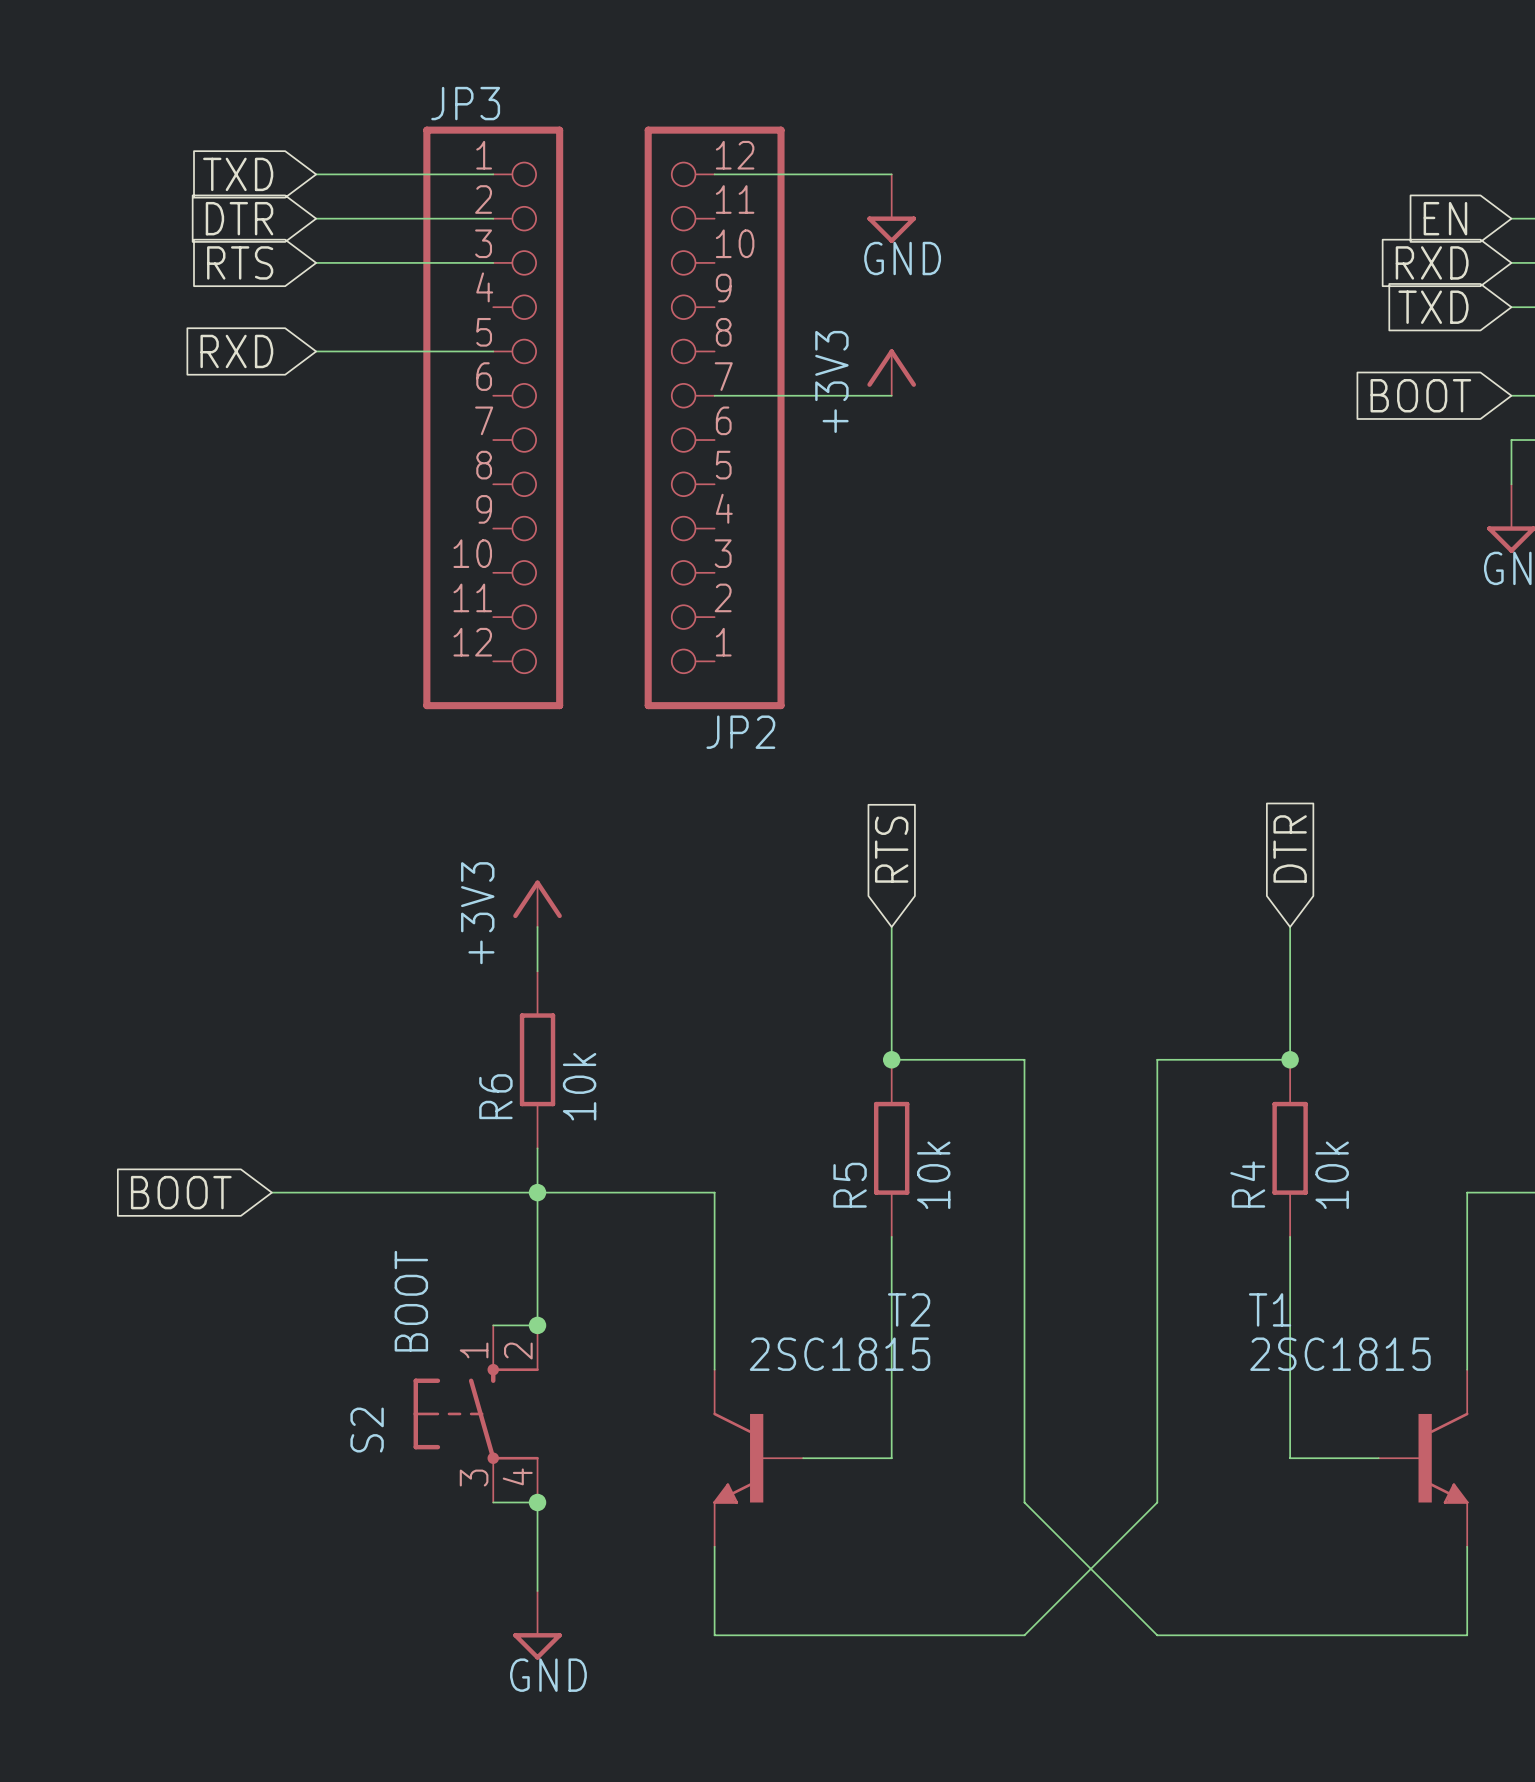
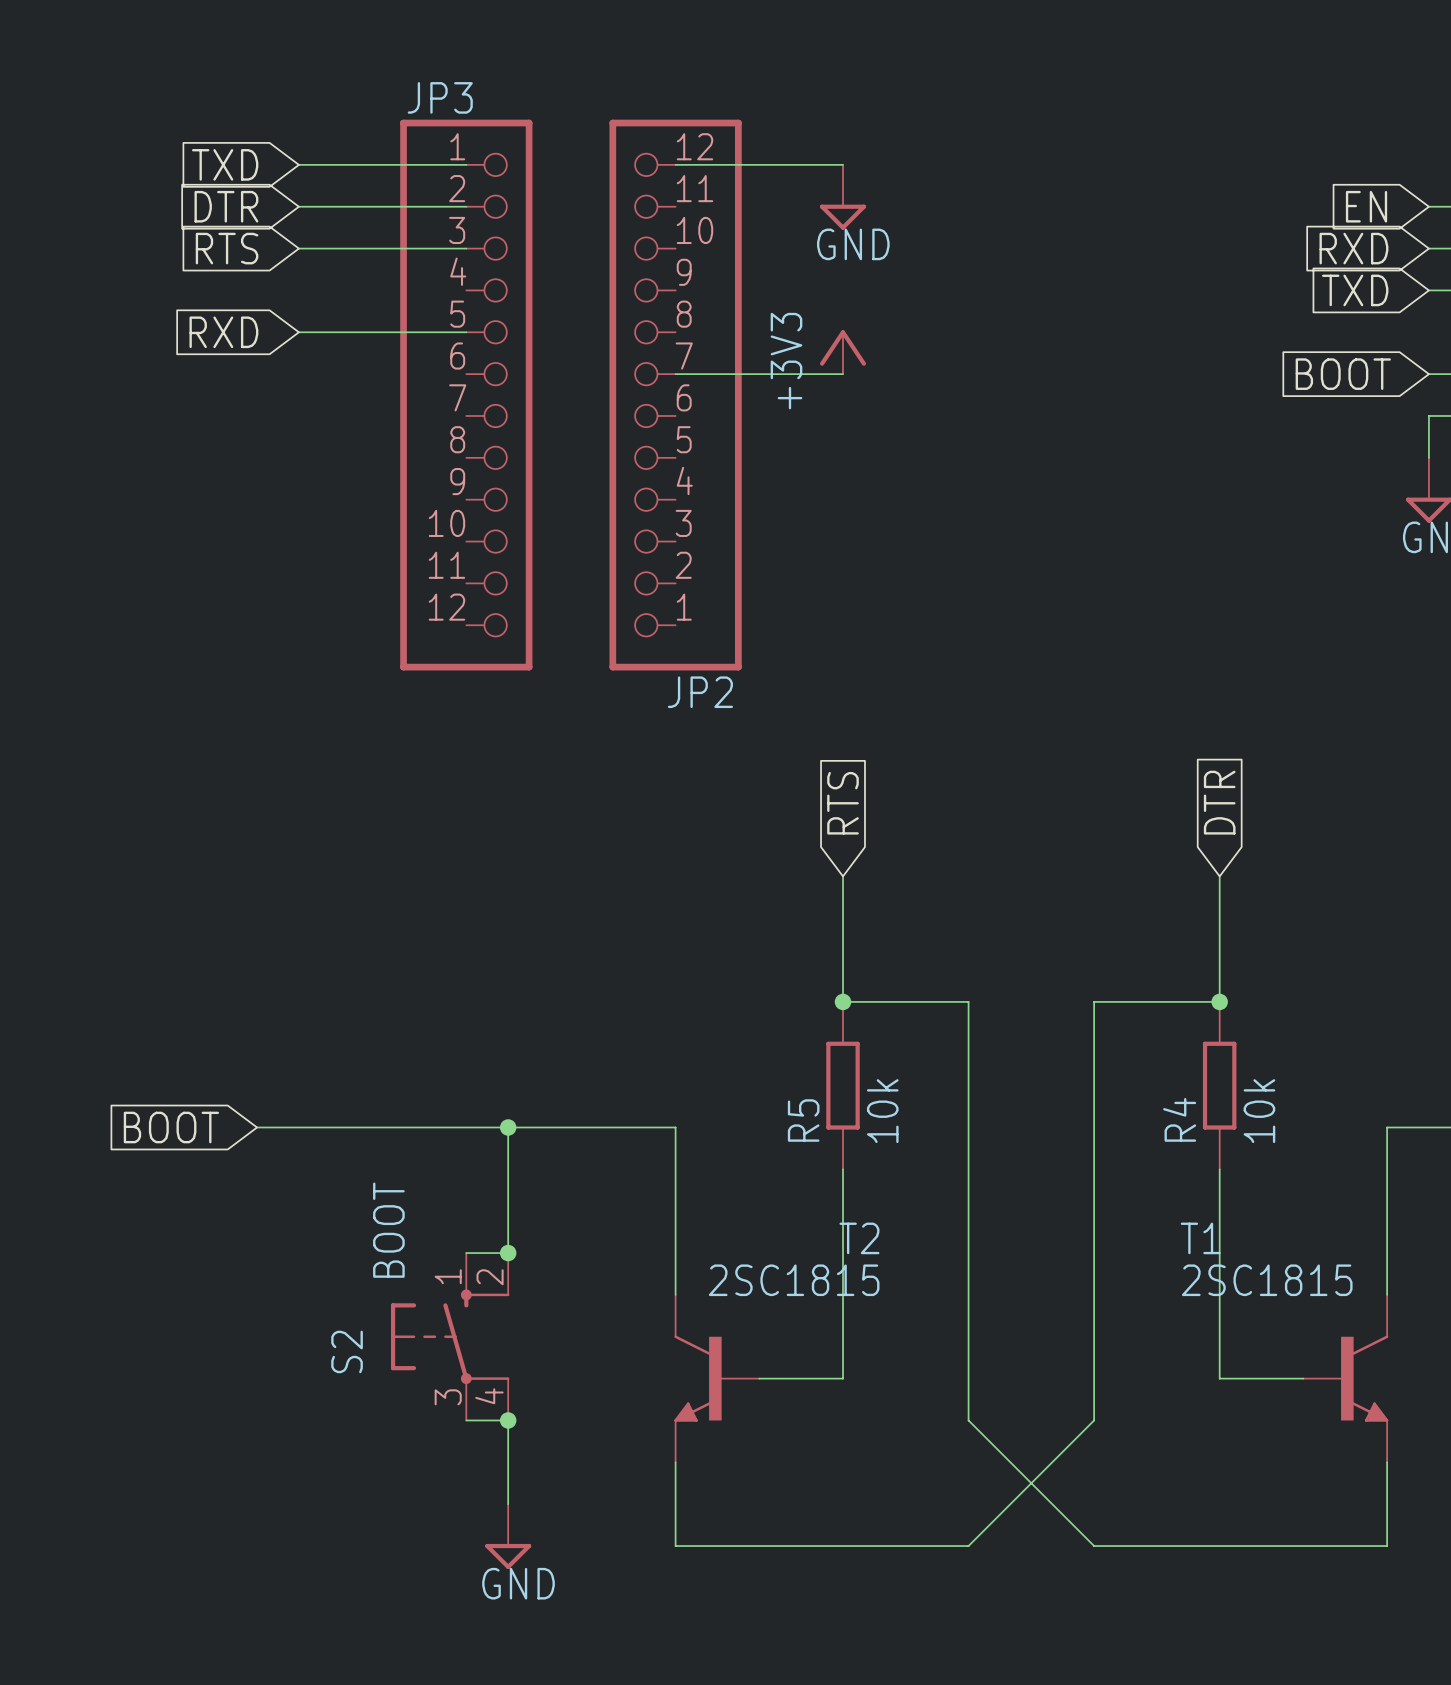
power symbol: +3V3 (537, 903) -> none
wire: (537, 926) (537, 971) -> none
R6: 10k (537, 1059) -> none
wire: (537, 1148) (537, 1192) -> none

